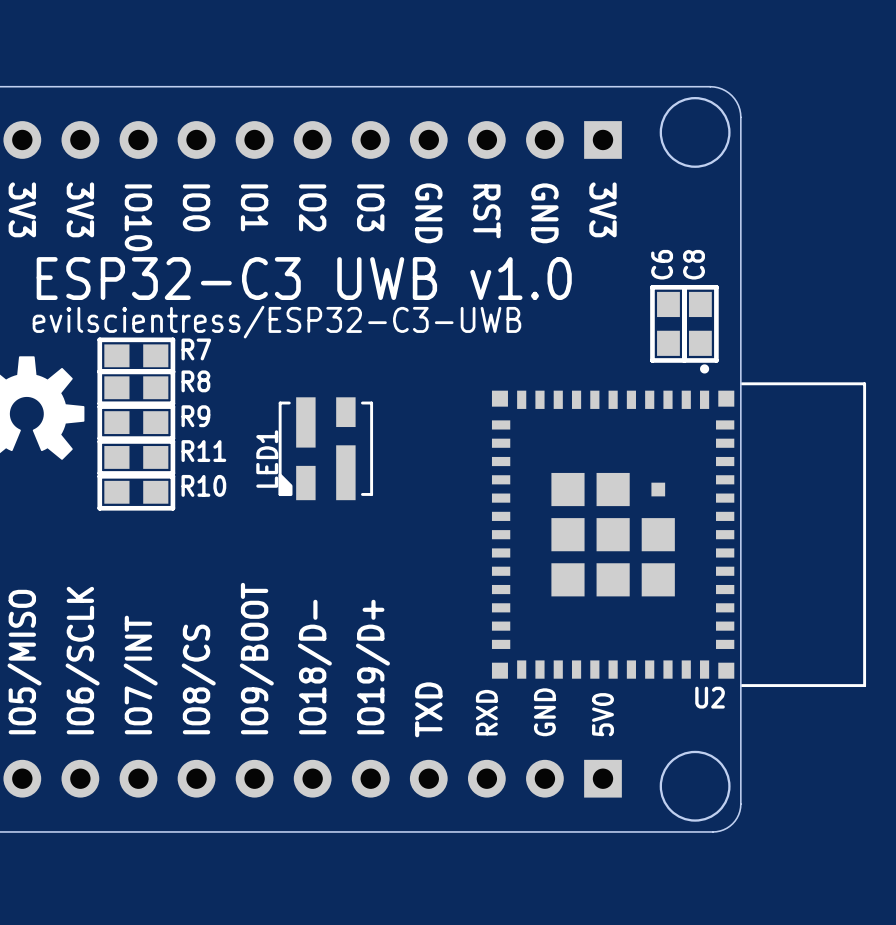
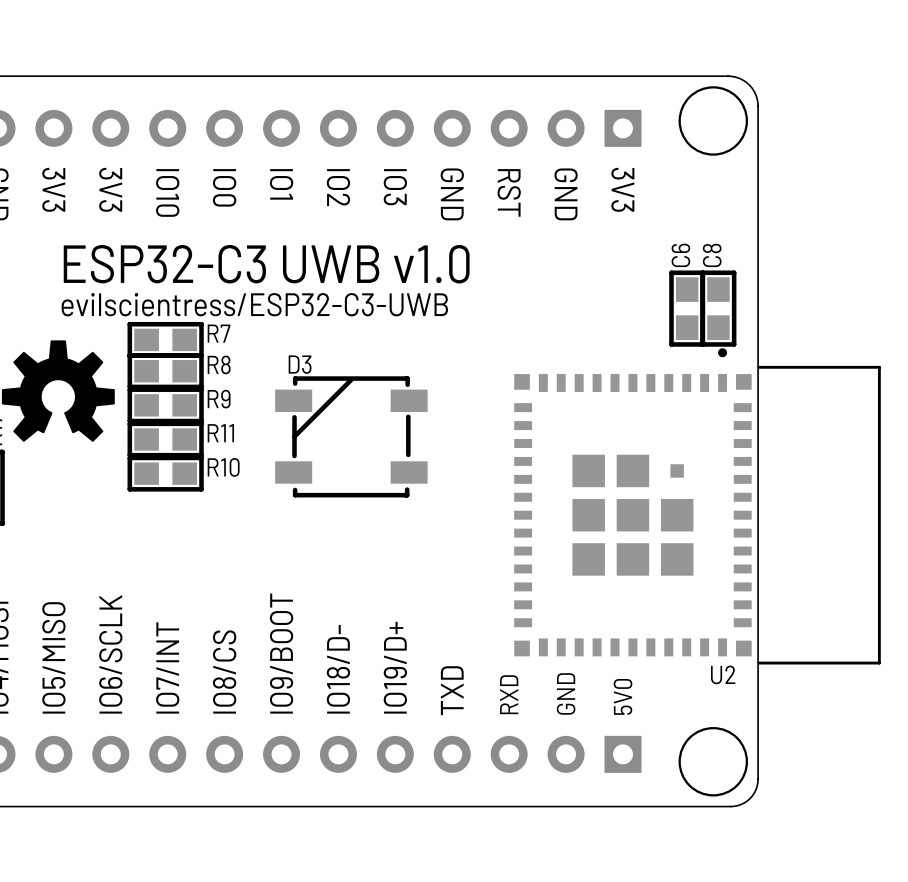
LED1: (325, 448) -> none
D3: none -> (351, 436)

